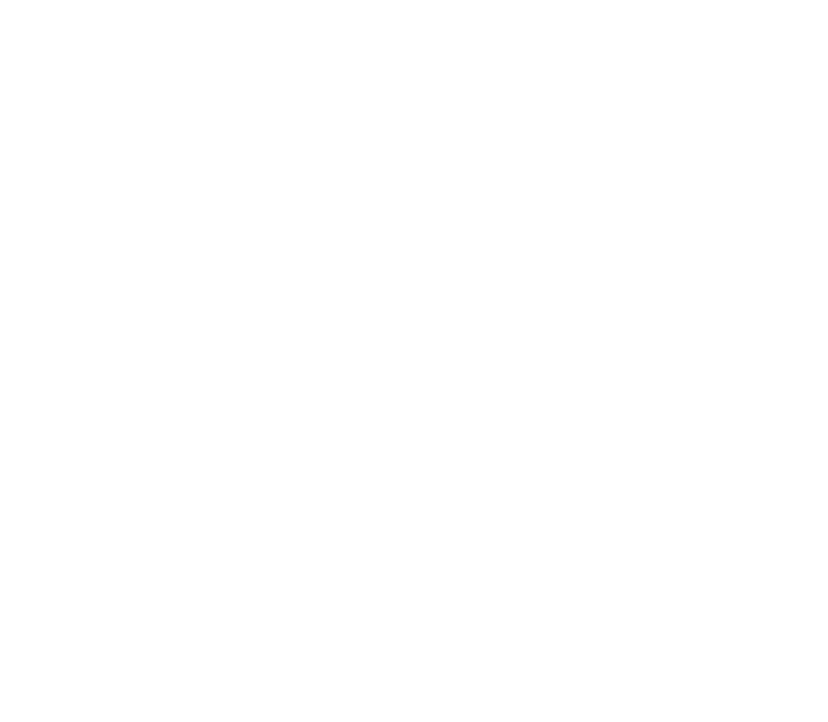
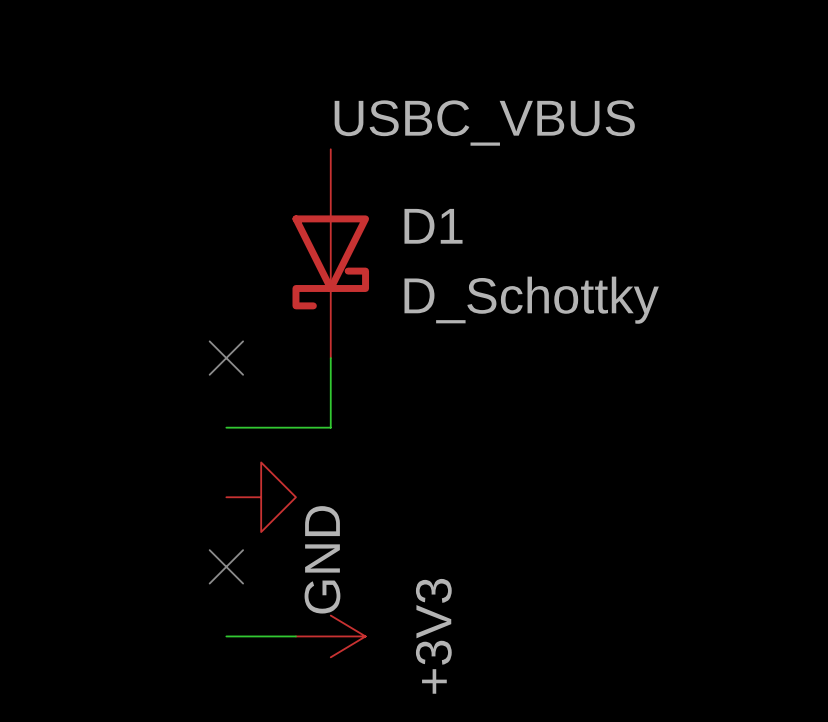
label: none -> USBC_VBUS (484, 123)
D1: none -> D_Schottky (330, 253)
no-connect mark: none -> (226, 358)
wire: none -> (330, 358) (330, 427) (226, 427)
power symbol: none -> GND (261, 497)
no-connect mark: none -> (226, 566)
wire: none -> (226, 636) (295, 636)
power symbol: none -> +3V3 (330, 636)

